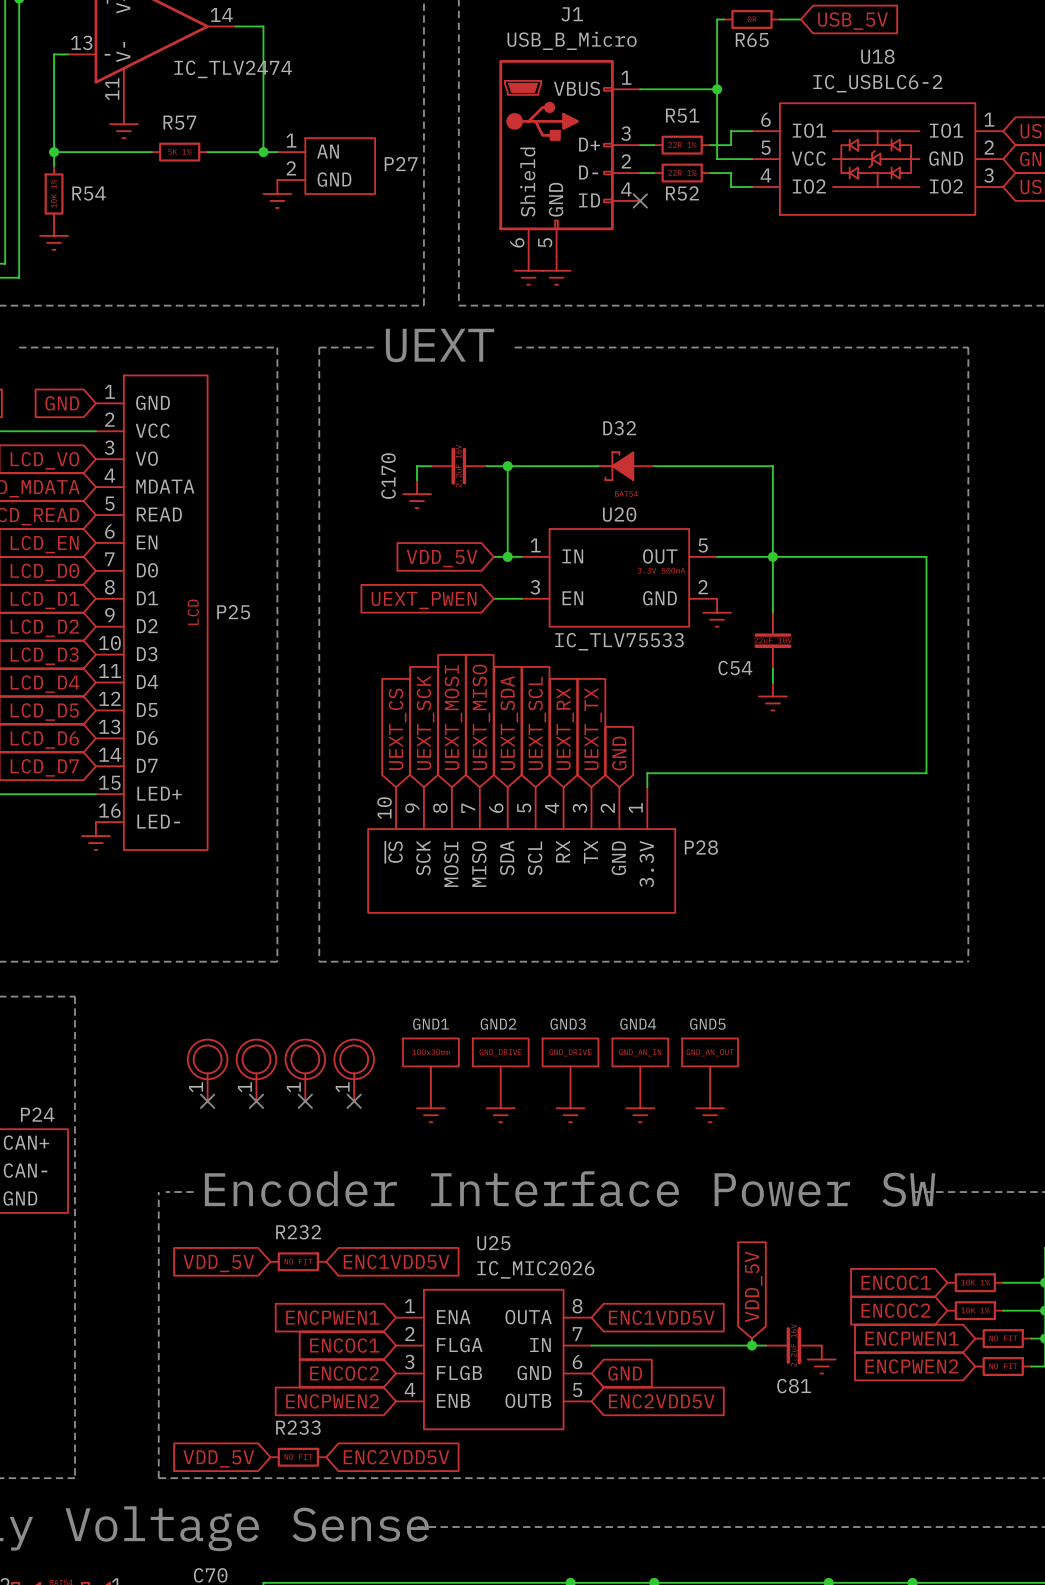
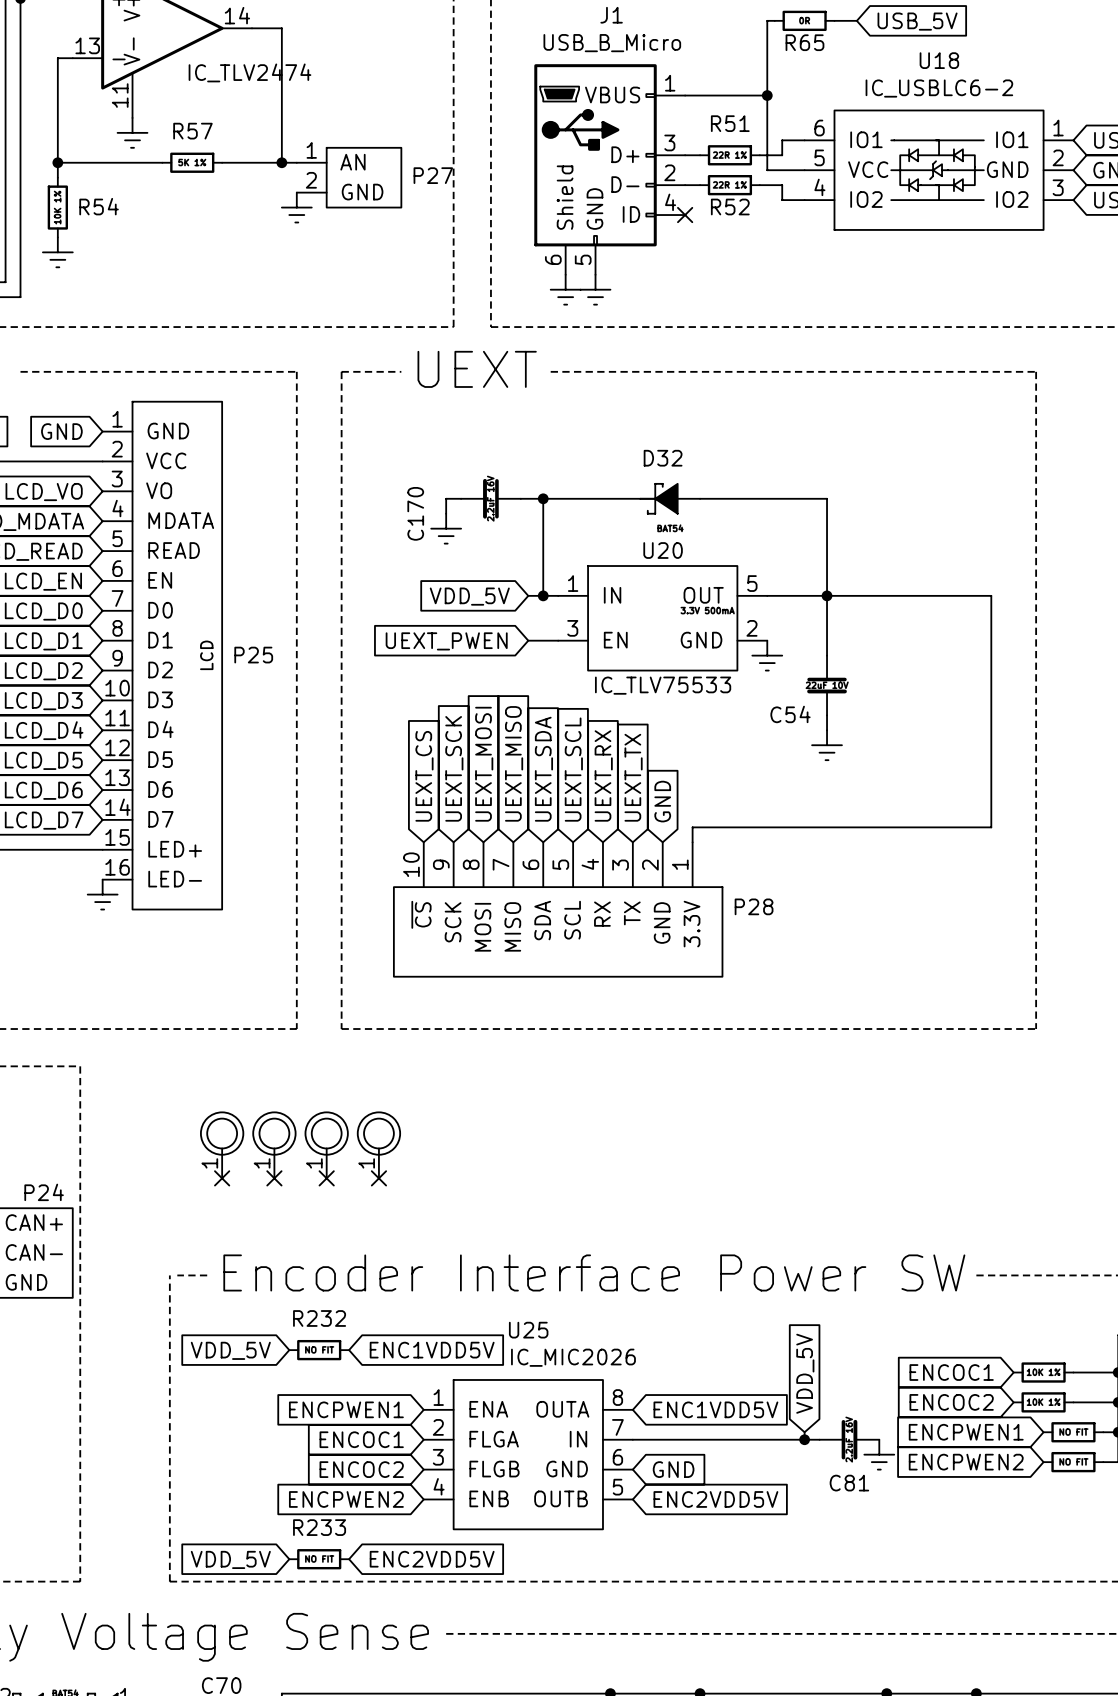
GND1: (430, 1066) -> none
GND2: (500, 1066) -> none
GND3: (570, 1066) -> none
GND4: (640, 1066) -> none
GND5: (710, 1066) -> none
power symbol: (430, 1108) -> none
power symbol: (500, 1108) -> none
power symbol: (570, 1108) -> none
power symbol: (640, 1108) -> none
power symbol: (710, 1108) -> none

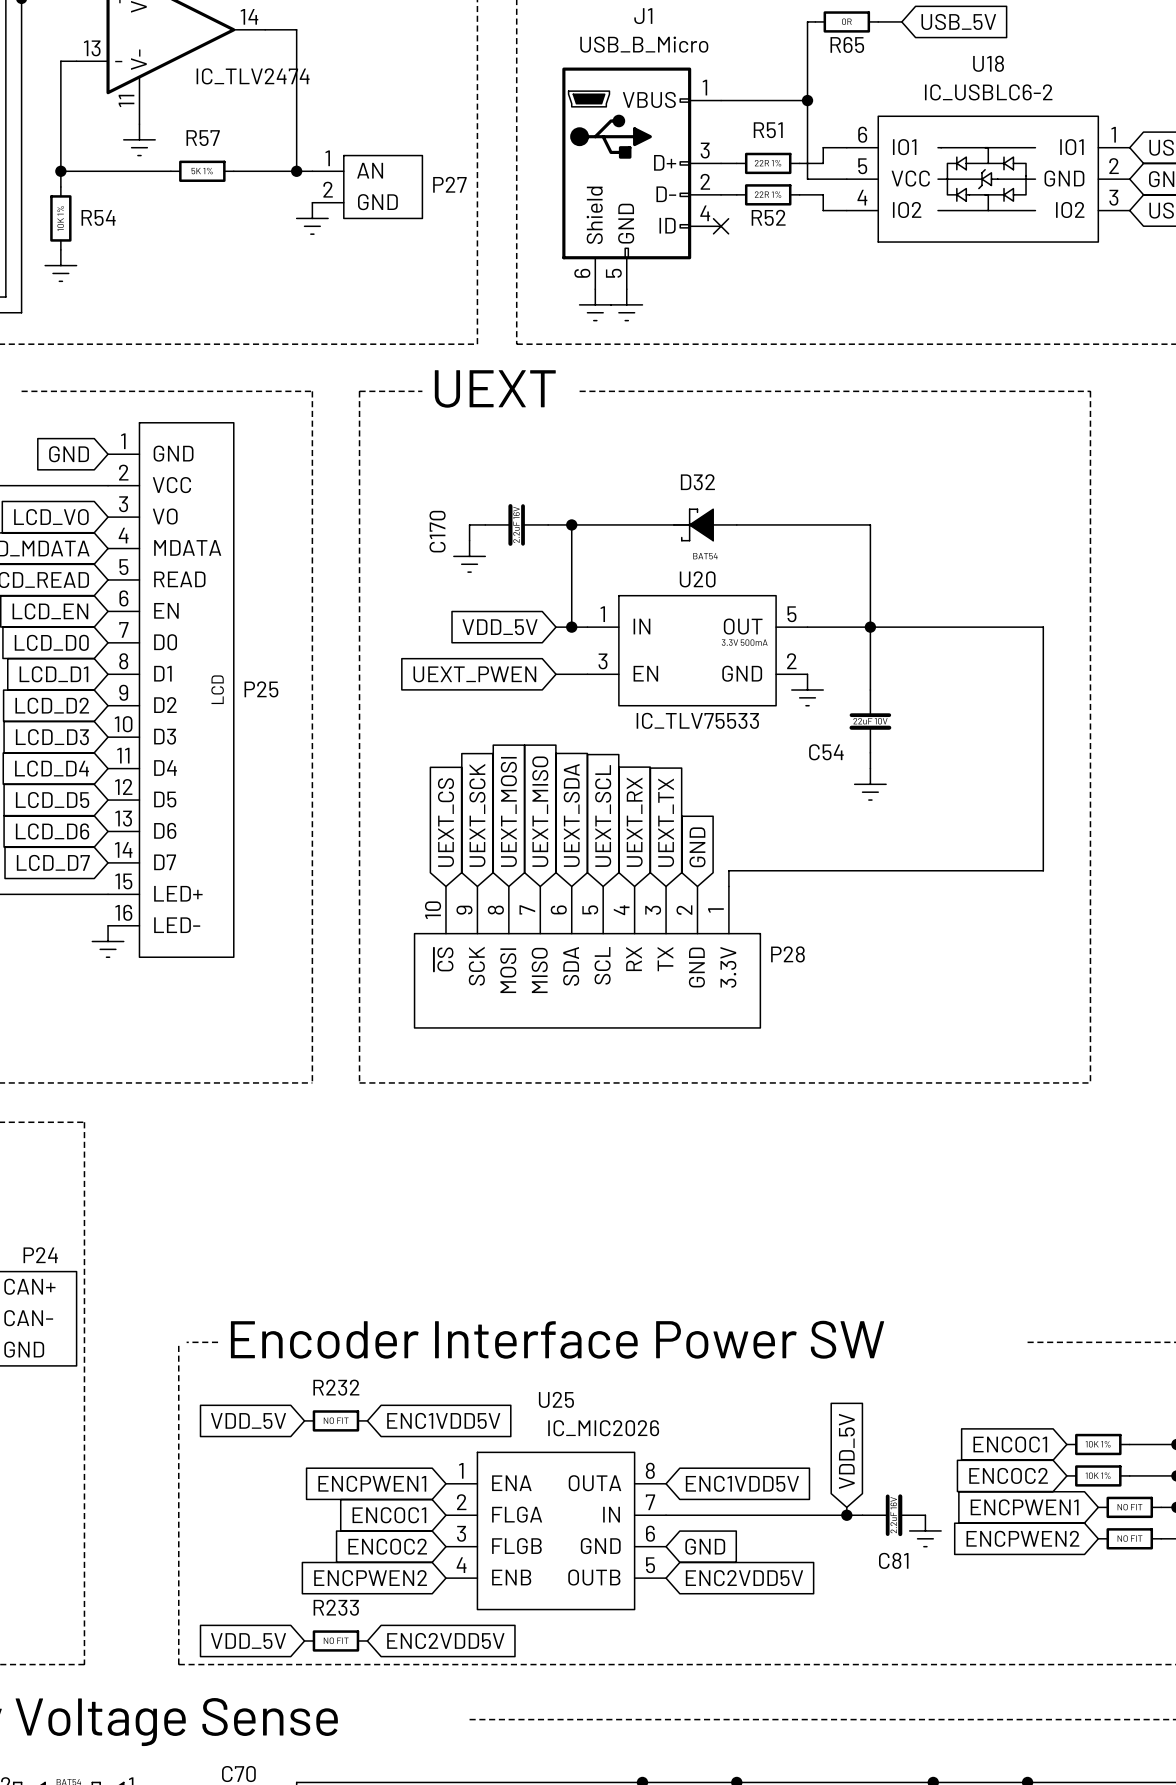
part: (222, 1145) -> none
part: (274, 1145) -> none
part: (326, 1145) -> none
part: (378, 1145) -> none
no-connect mark: (222, 1178) -> none
no-connect mark: (274, 1178) -> none
no-connect mark: (326, 1178) -> none
no-connect mark: (378, 1178) -> none

